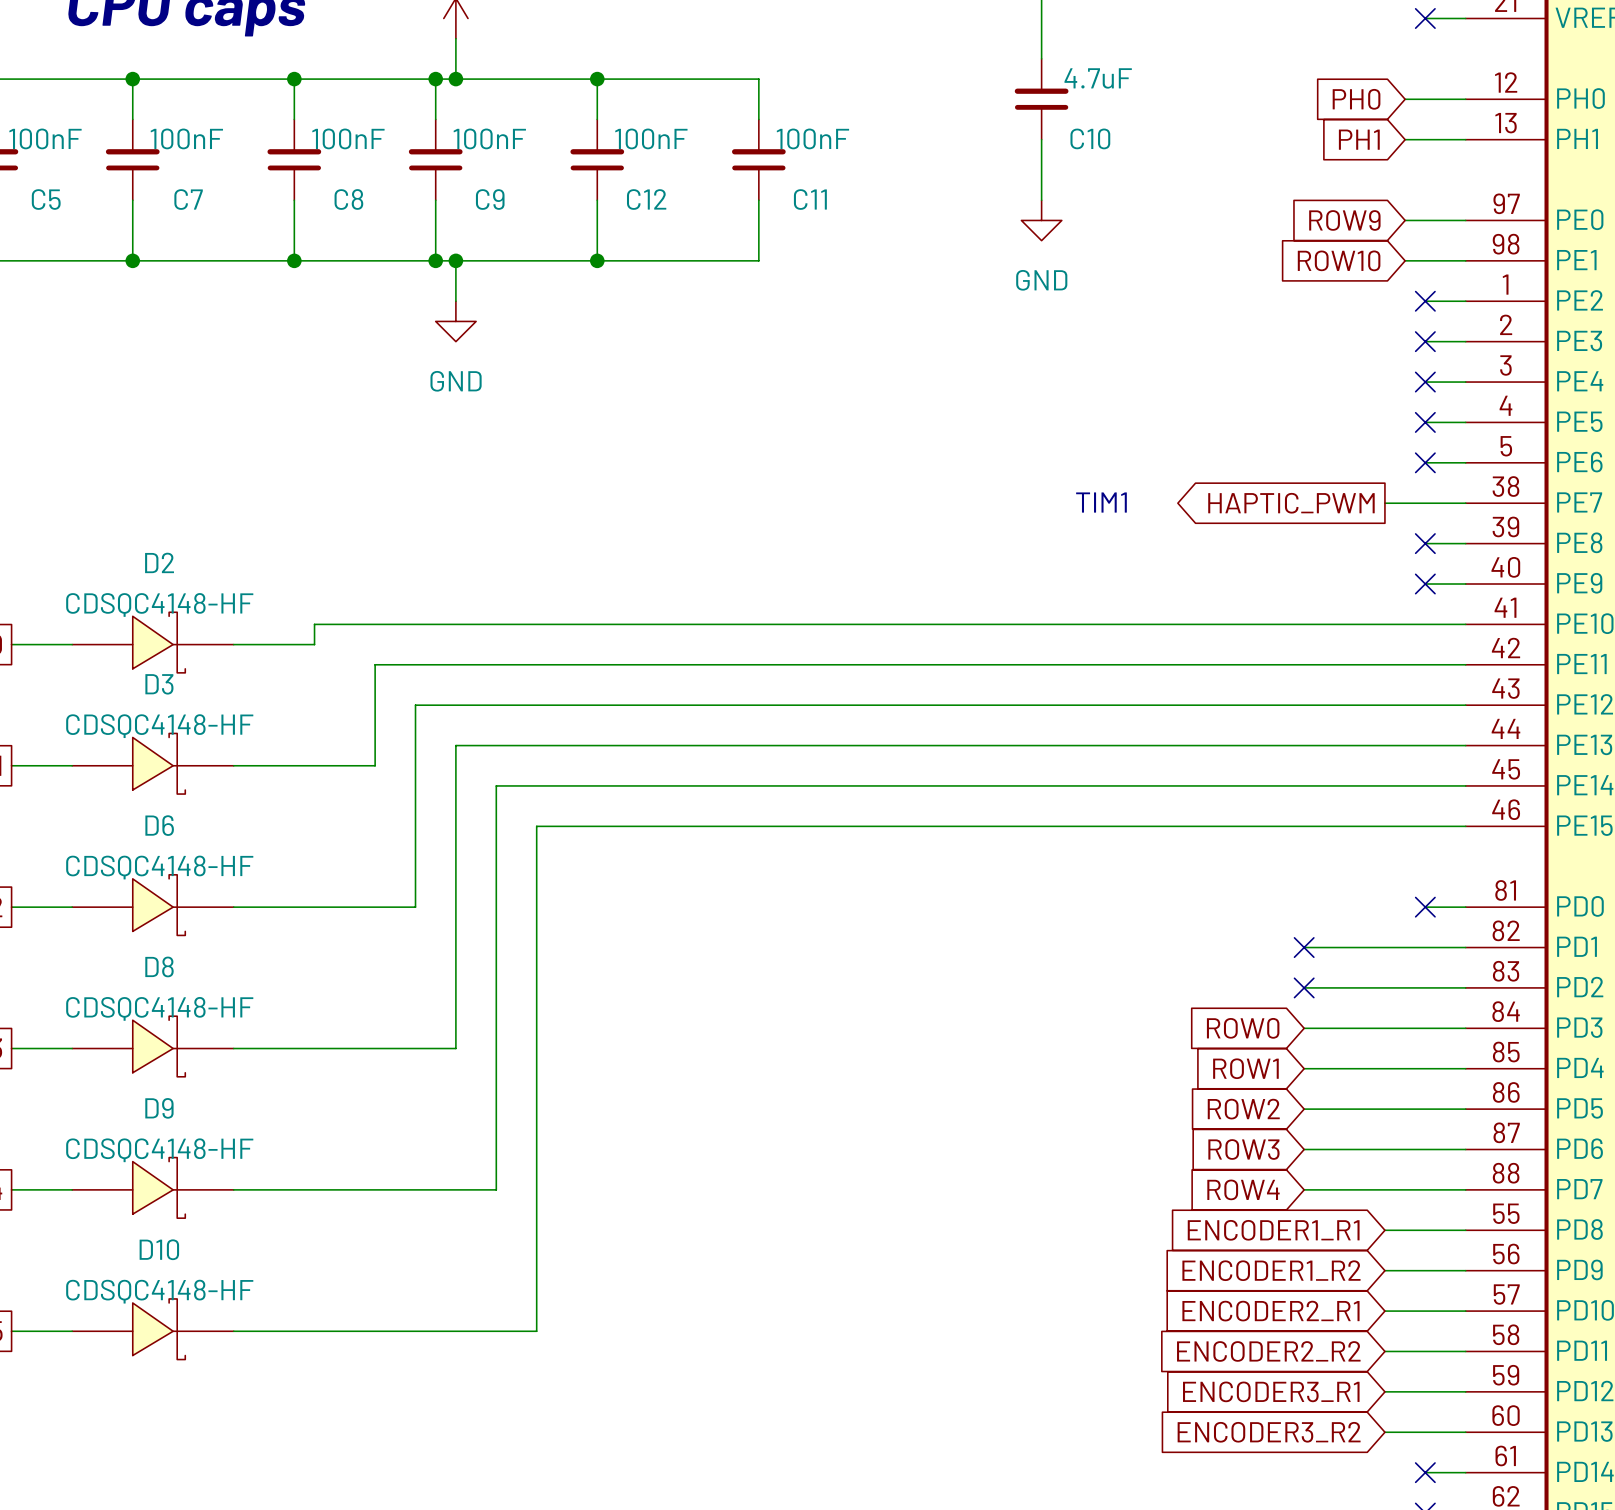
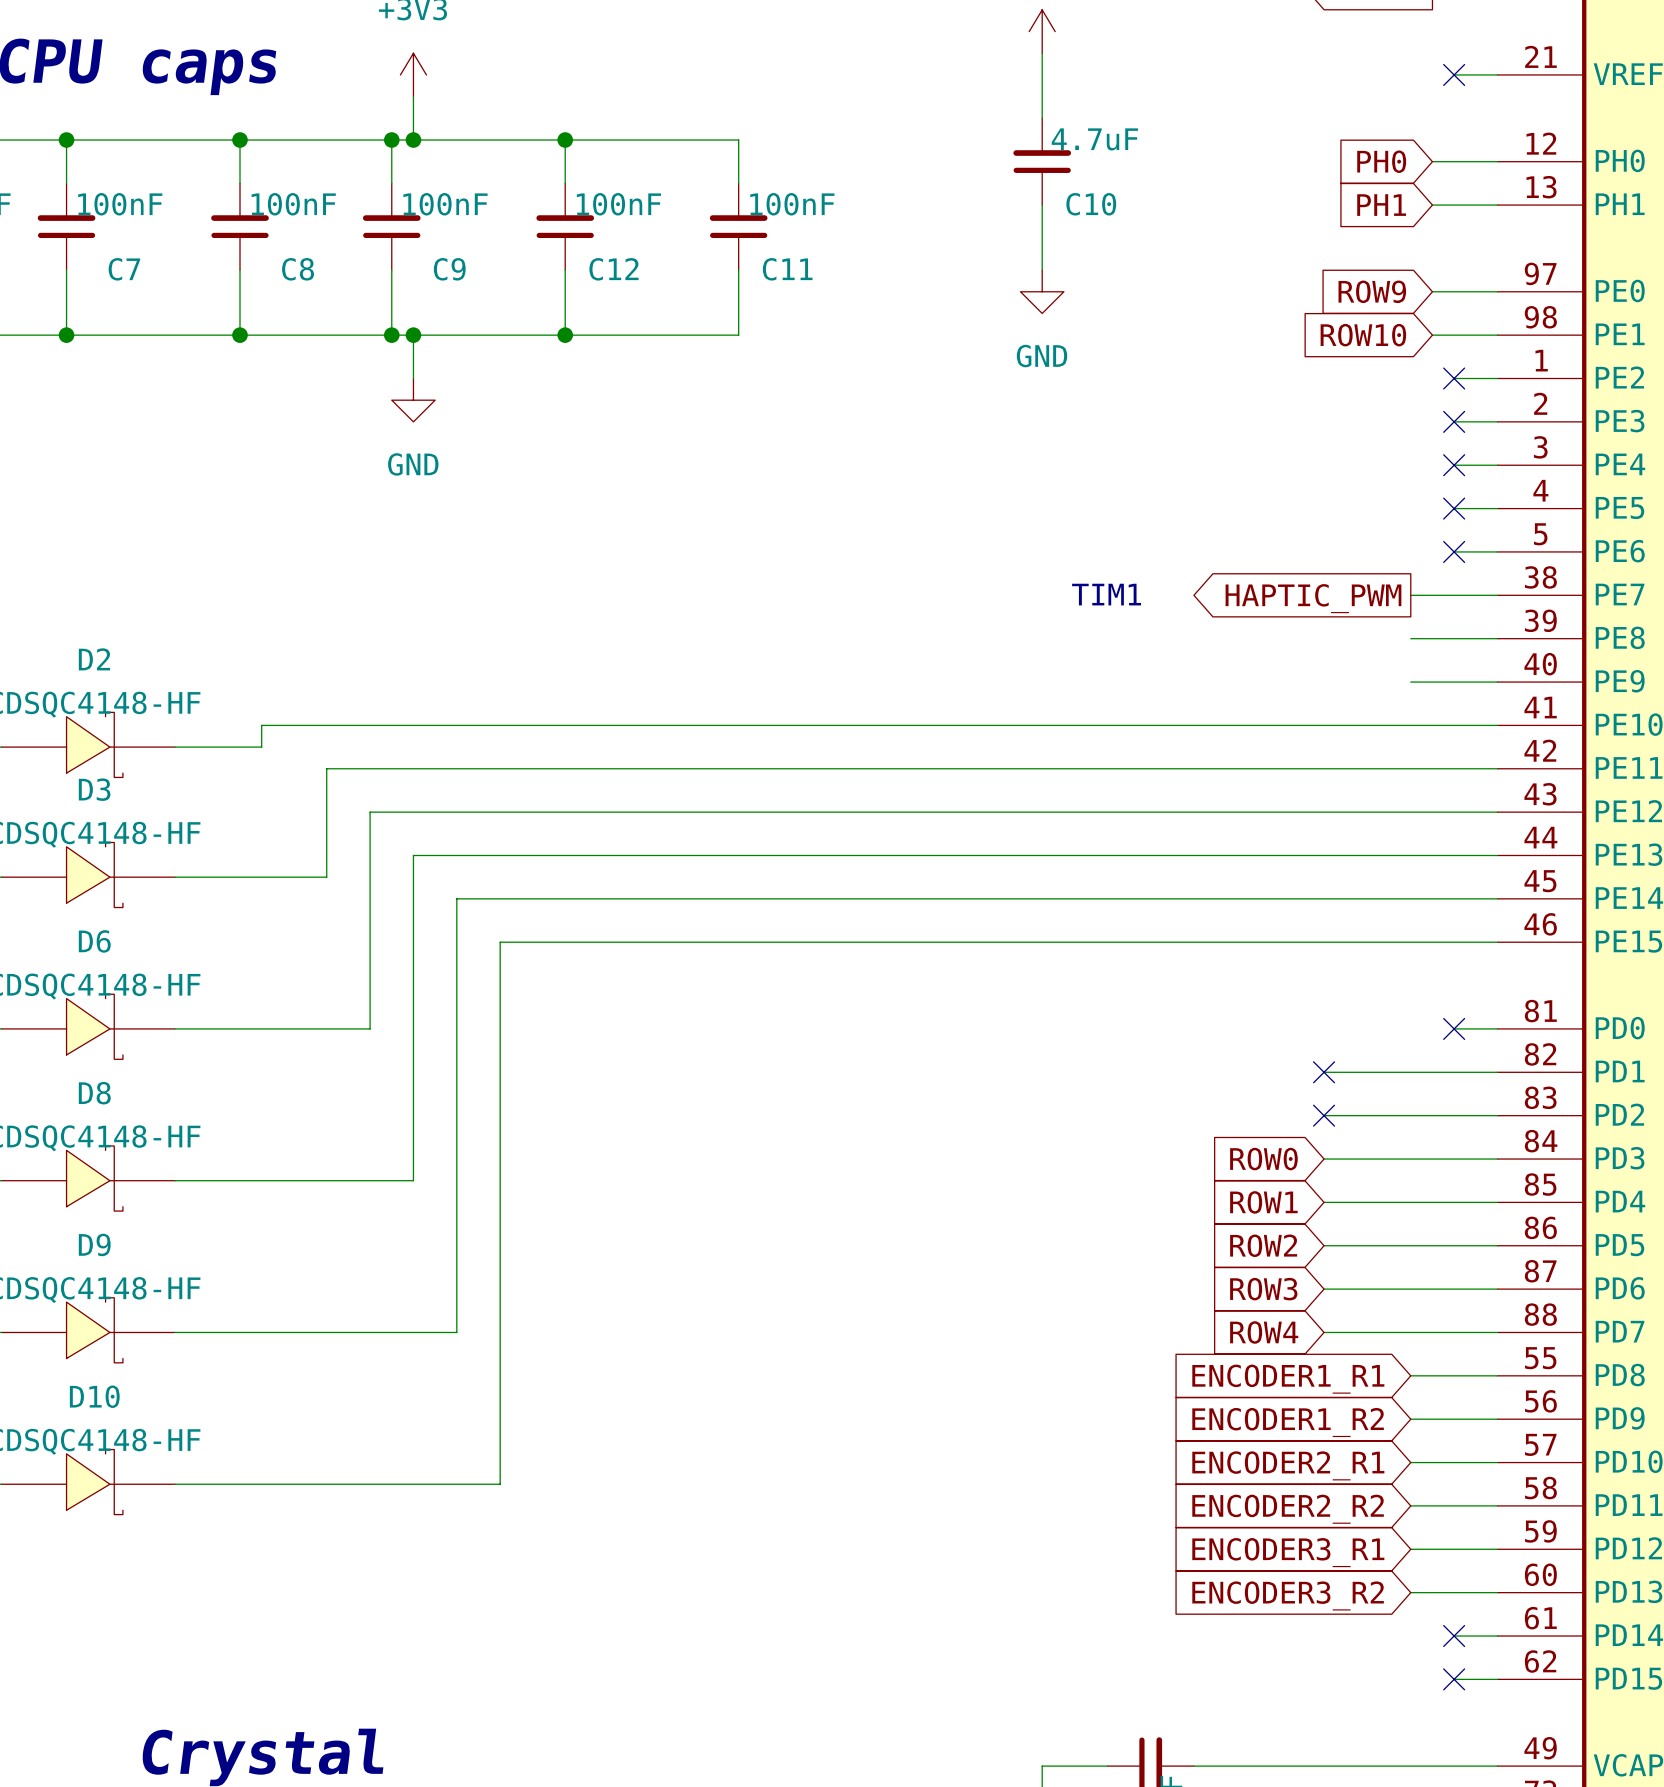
wire: none -> (1410, 638) (1454, 638)
no-connect mark: (1425, 543) -> none
wire: none -> (1410, 682) (1454, 682)
no-connect mark: (1425, 584) -> none

